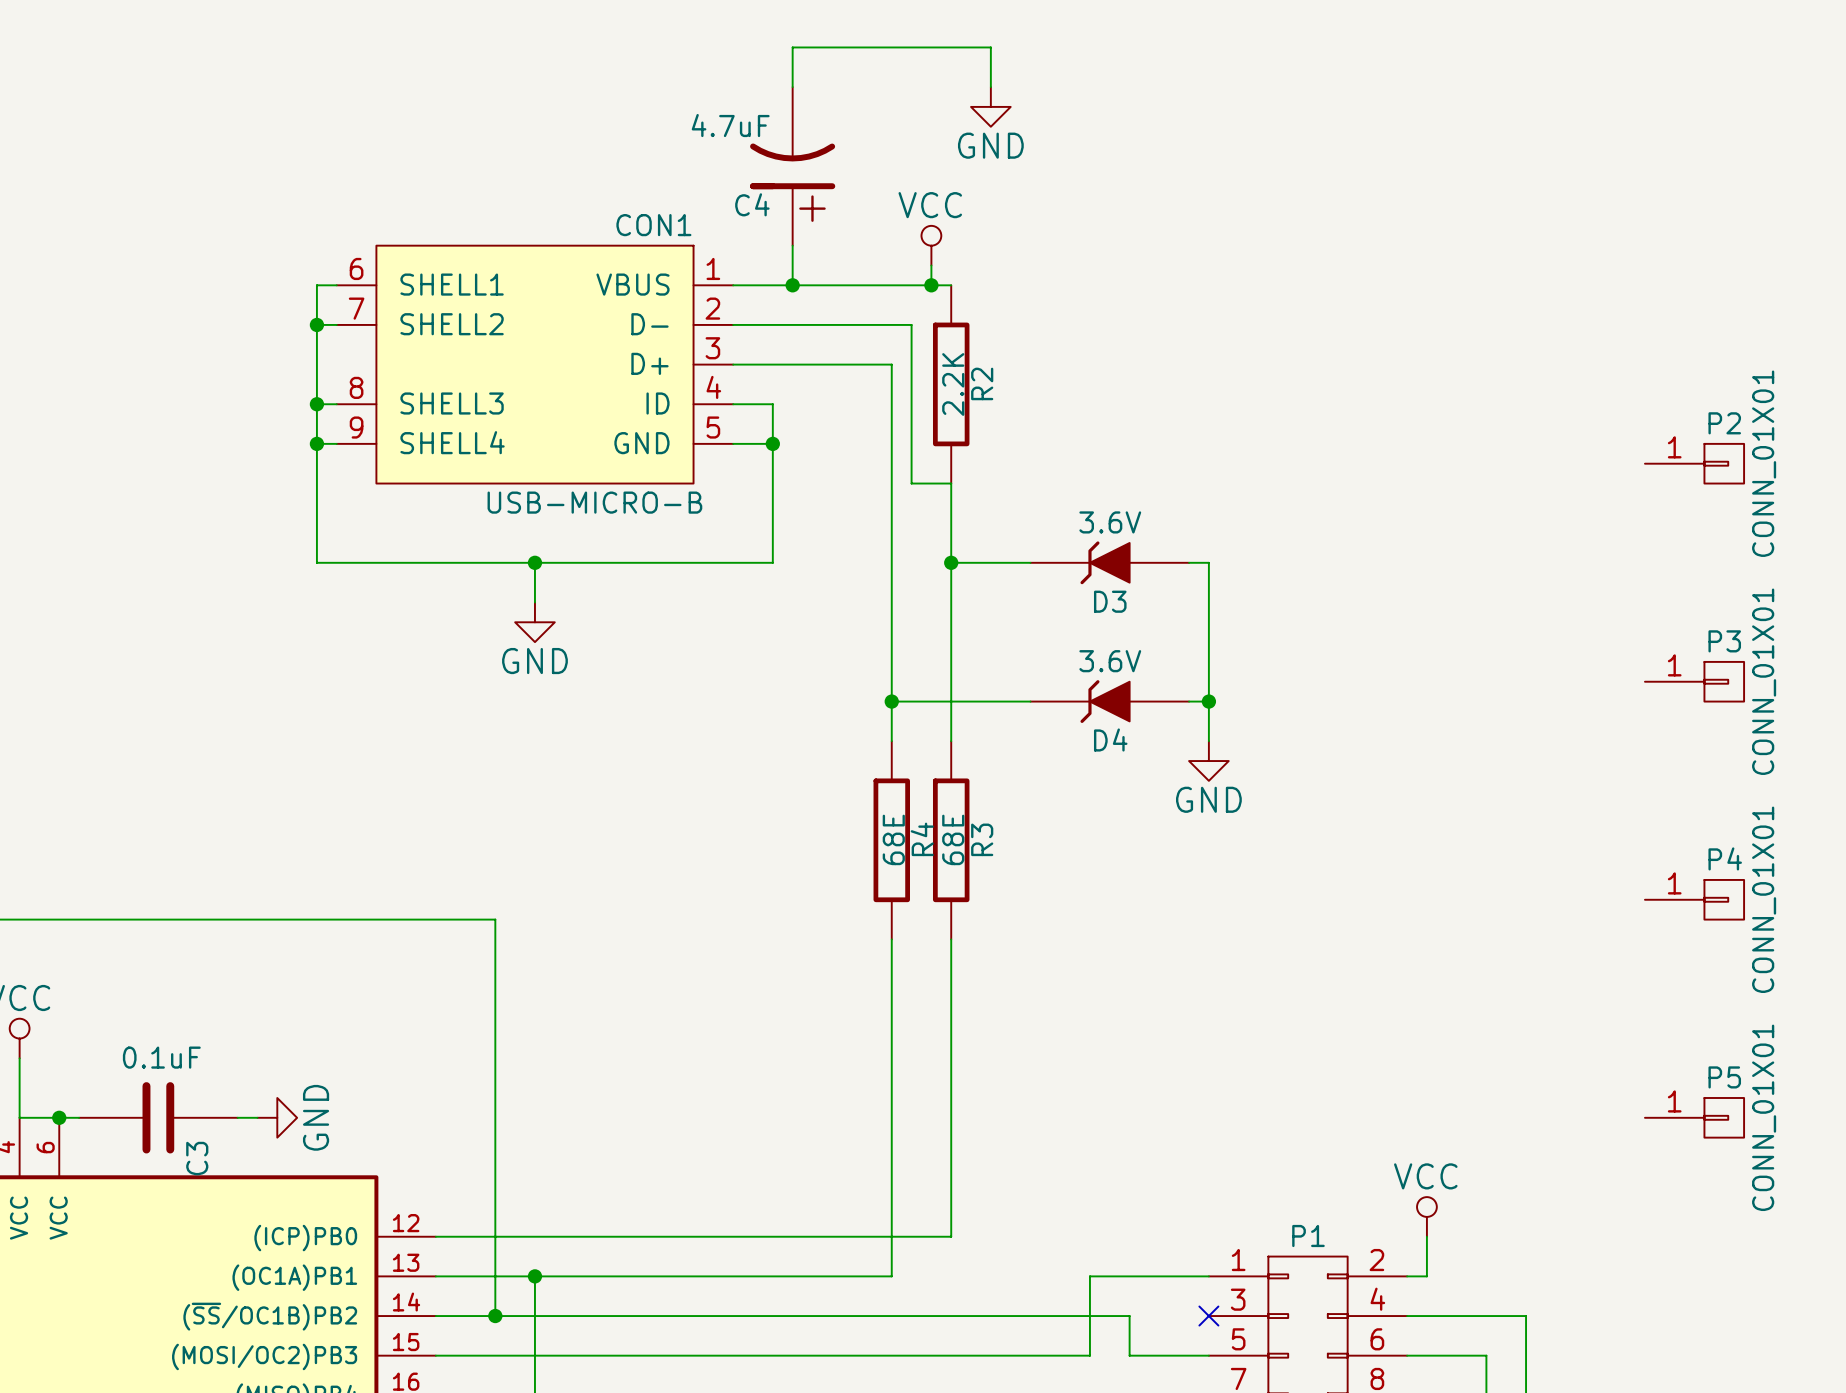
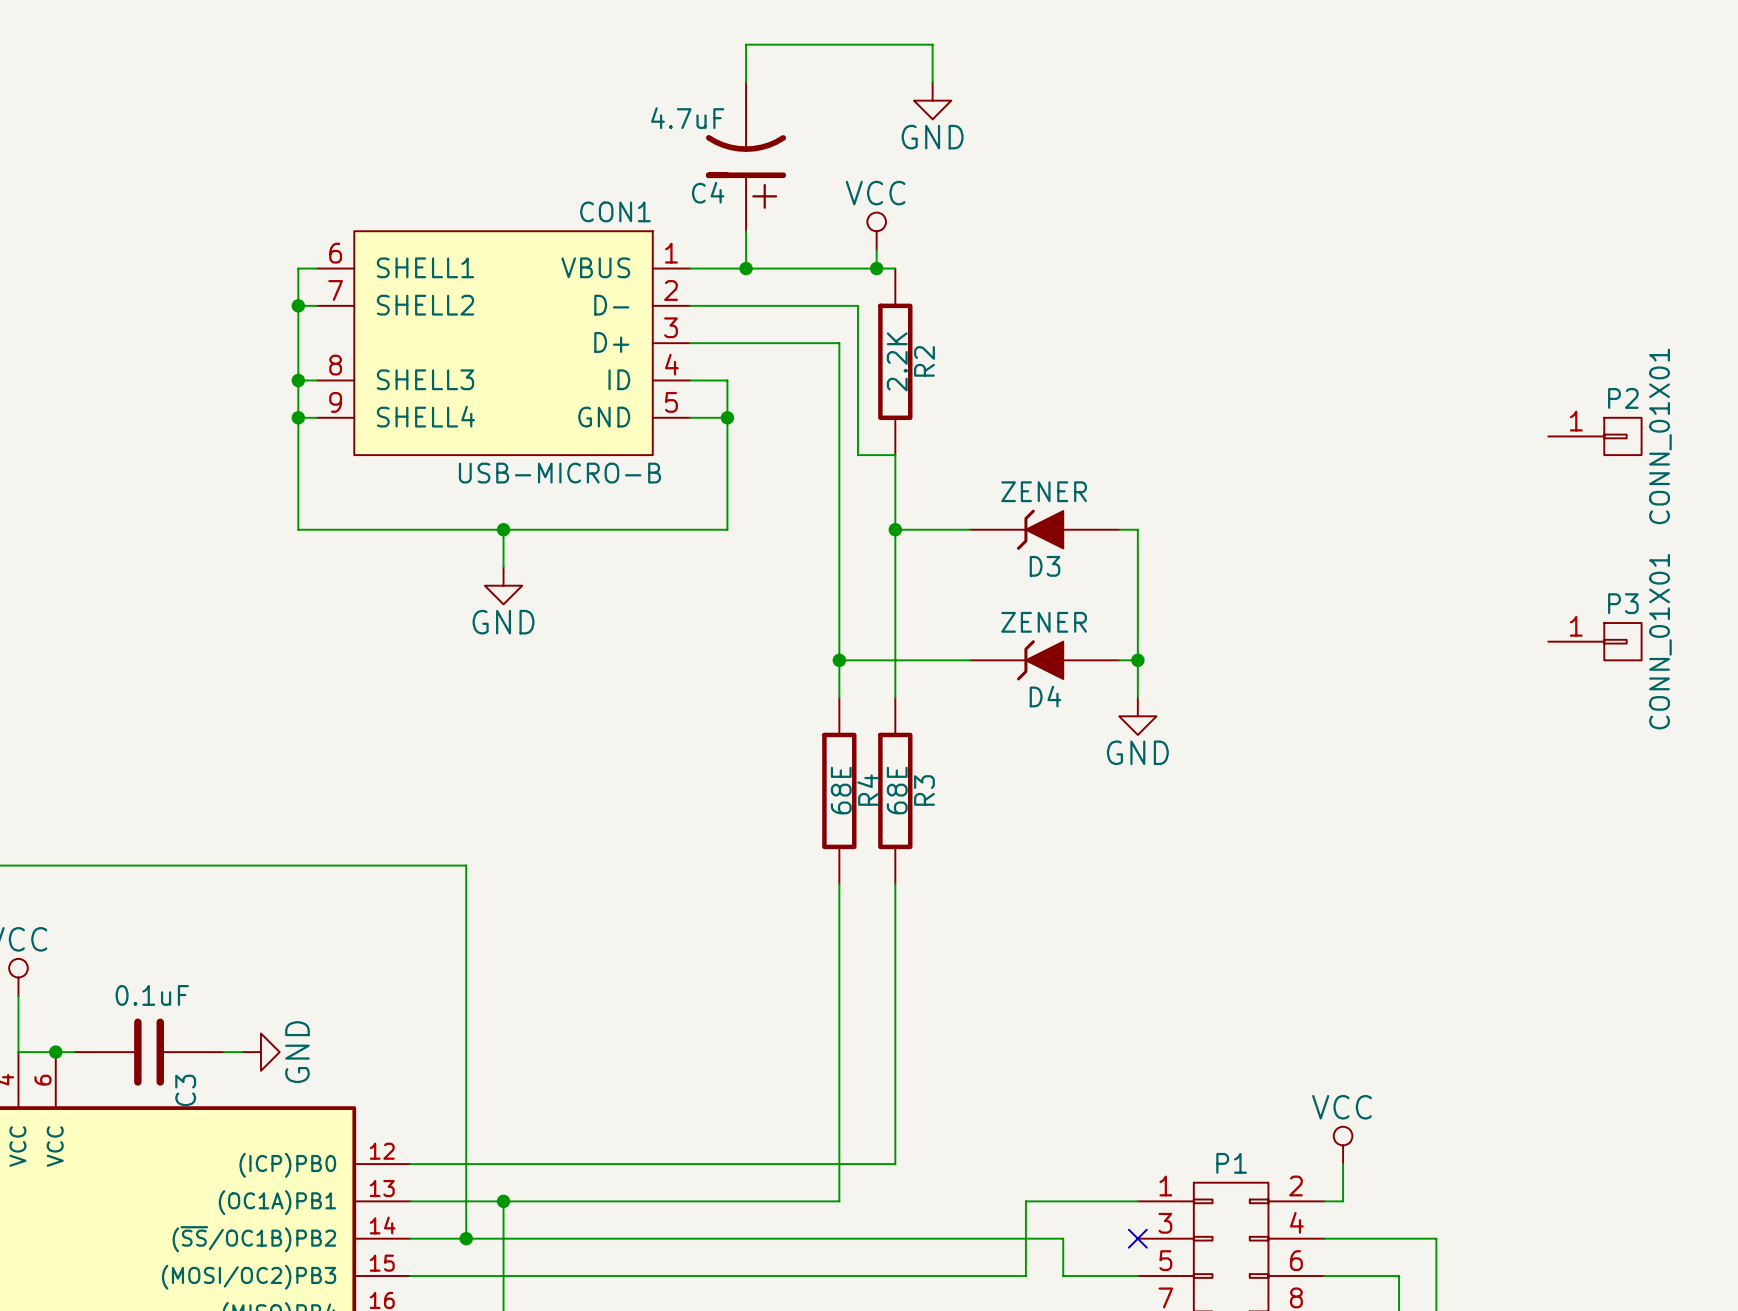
D3 value: 3.6V (1110, 522) -> ZENER (1044, 491)
D4 value: 3.6V (1110, 661) -> ZENER (1044, 622)
P4: CONN_01X01 (1694, 899) -> none
P5: CONN_01X01 (1694, 1117) -> none

